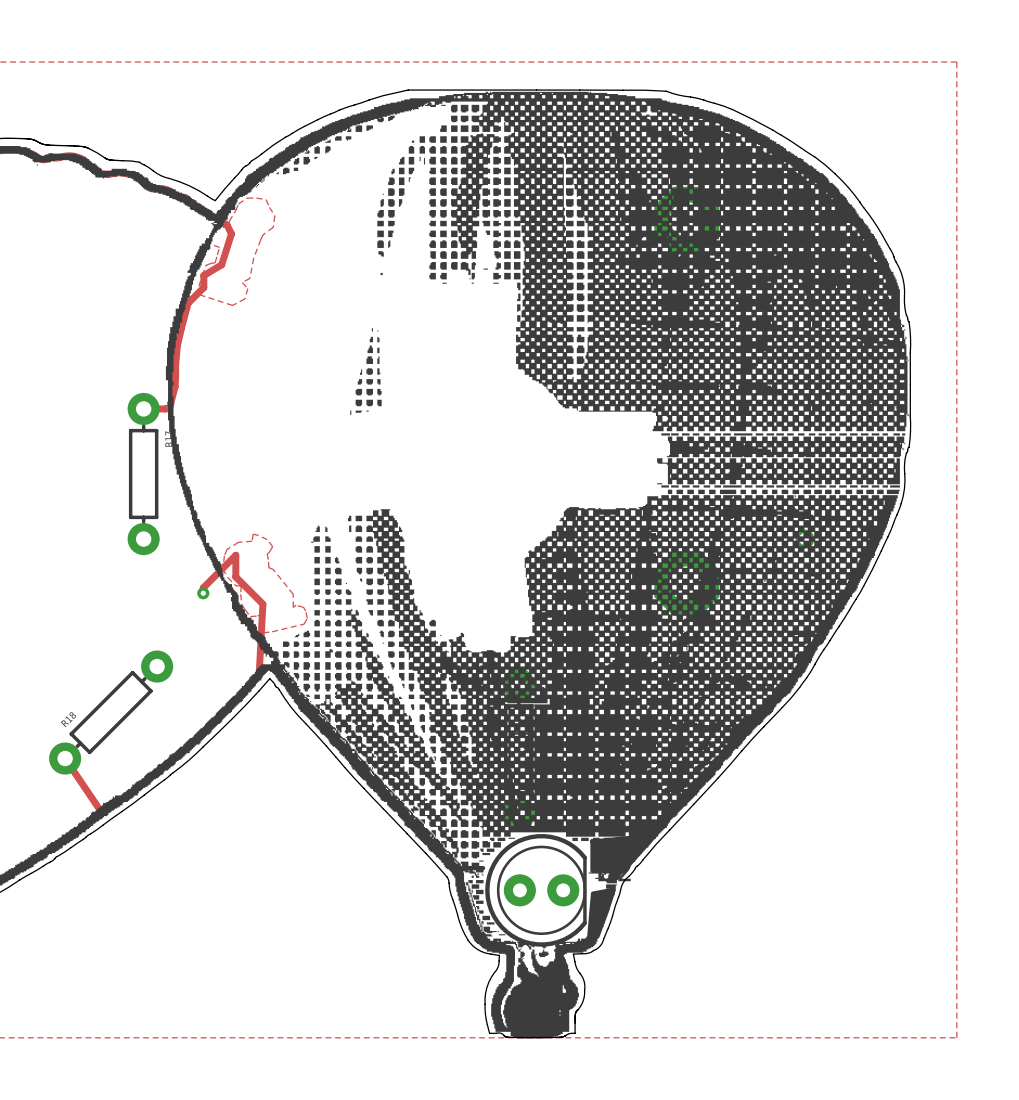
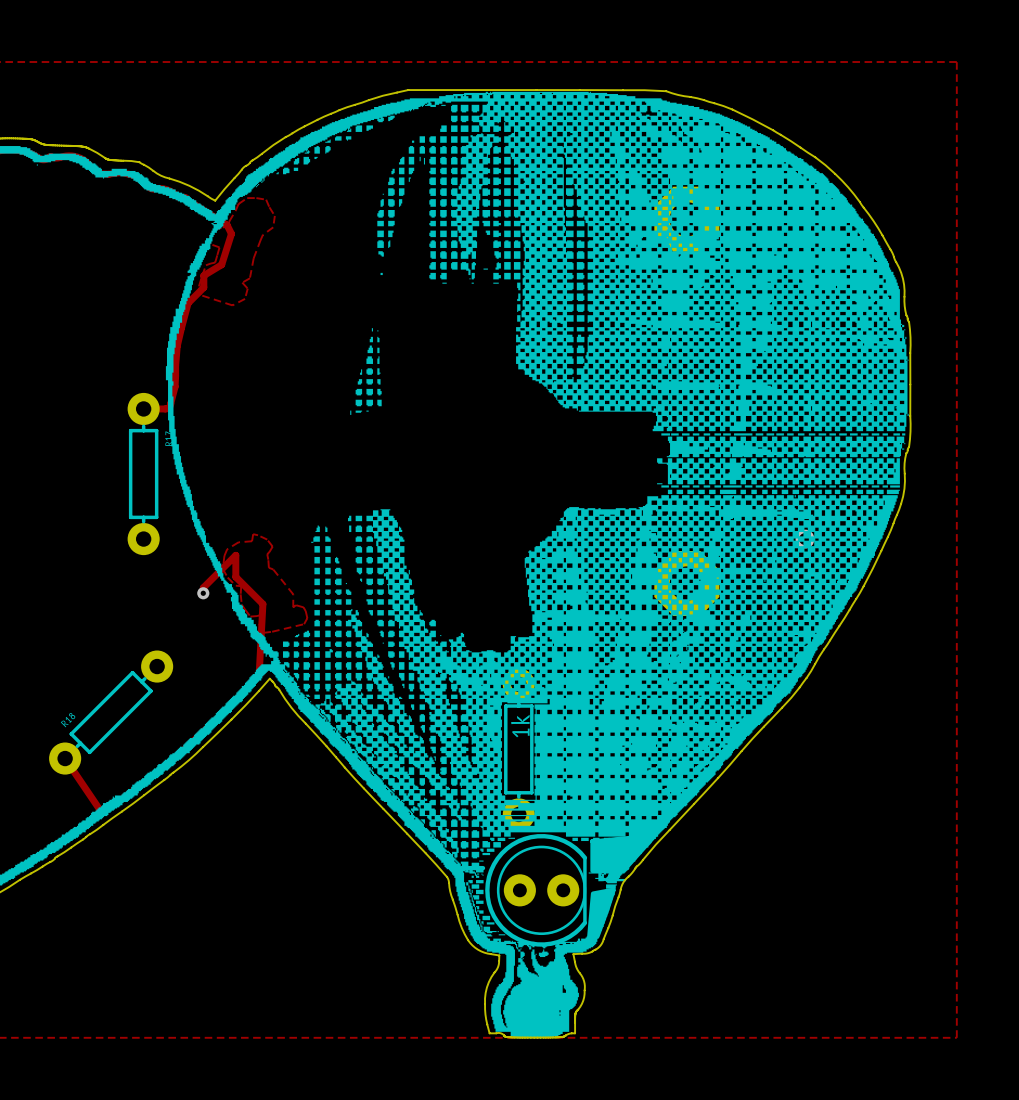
drawing: [451, 702, 777, 826] -> none
drawing: none -> [451, 702, 502, 796]
drawing: none -> [534, 704, 777, 800]

